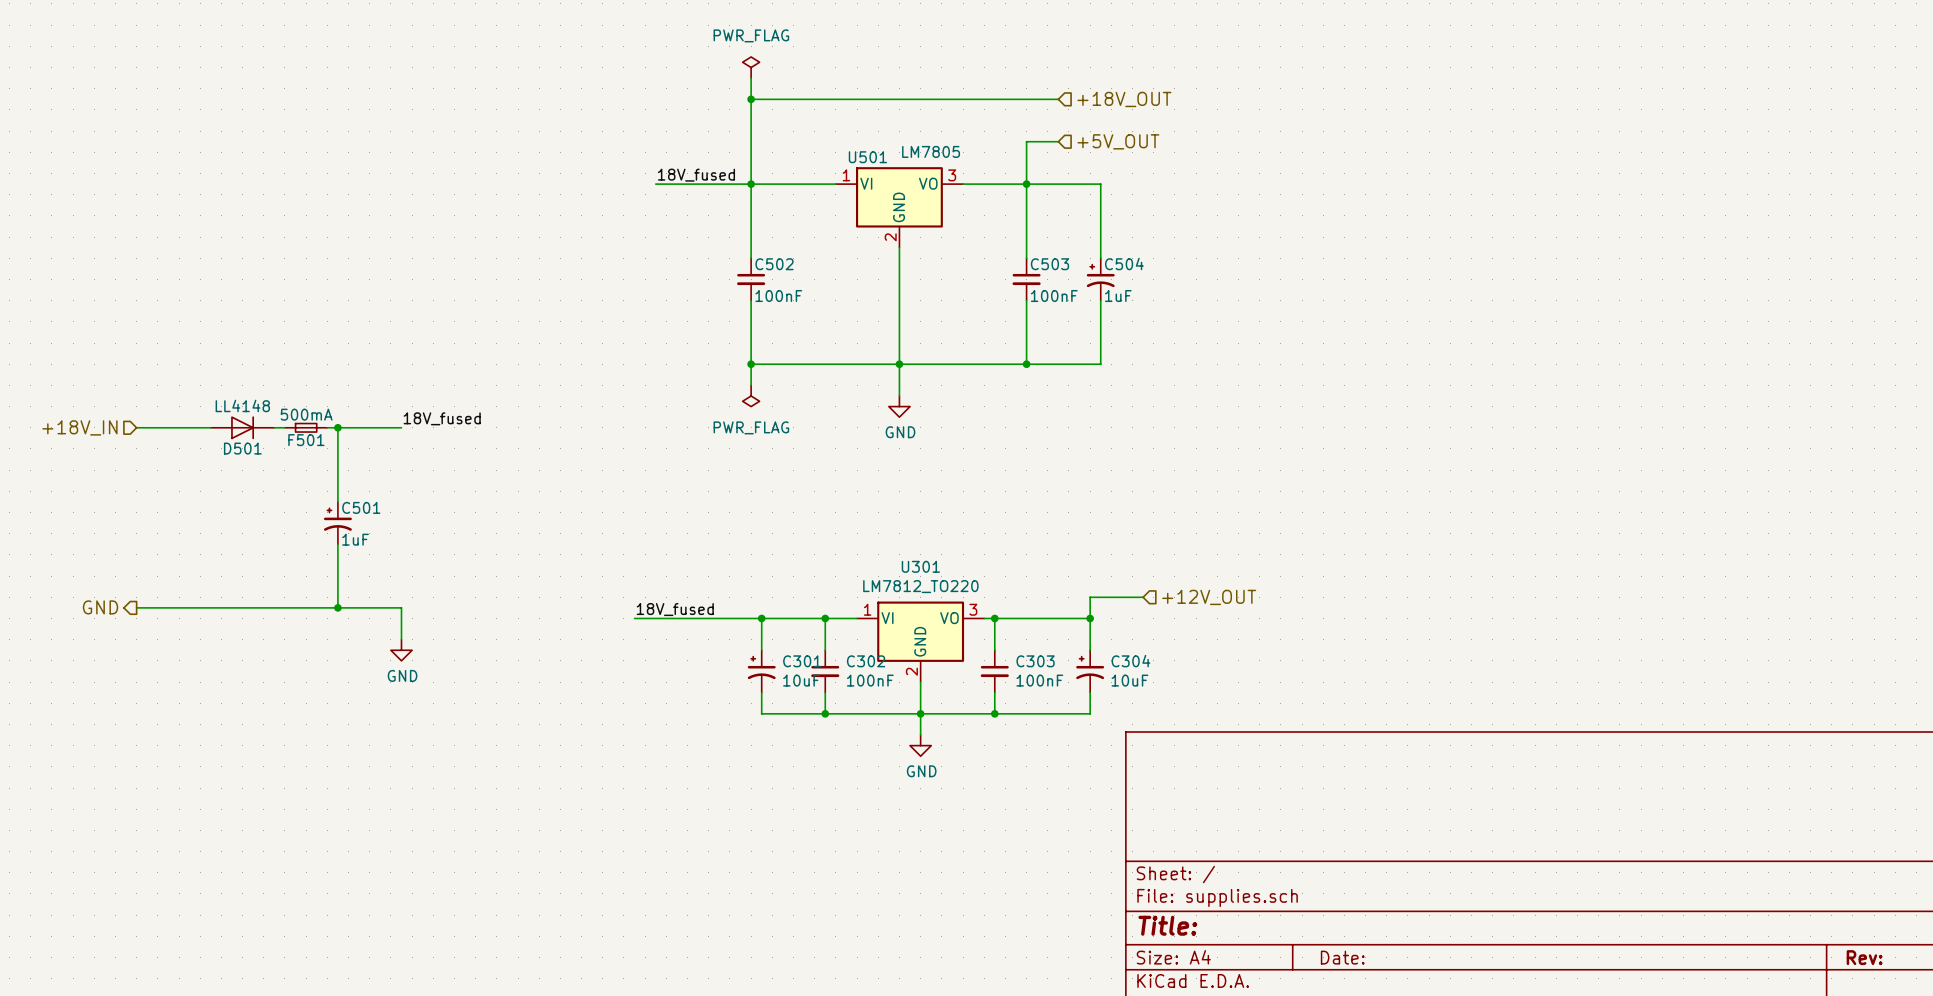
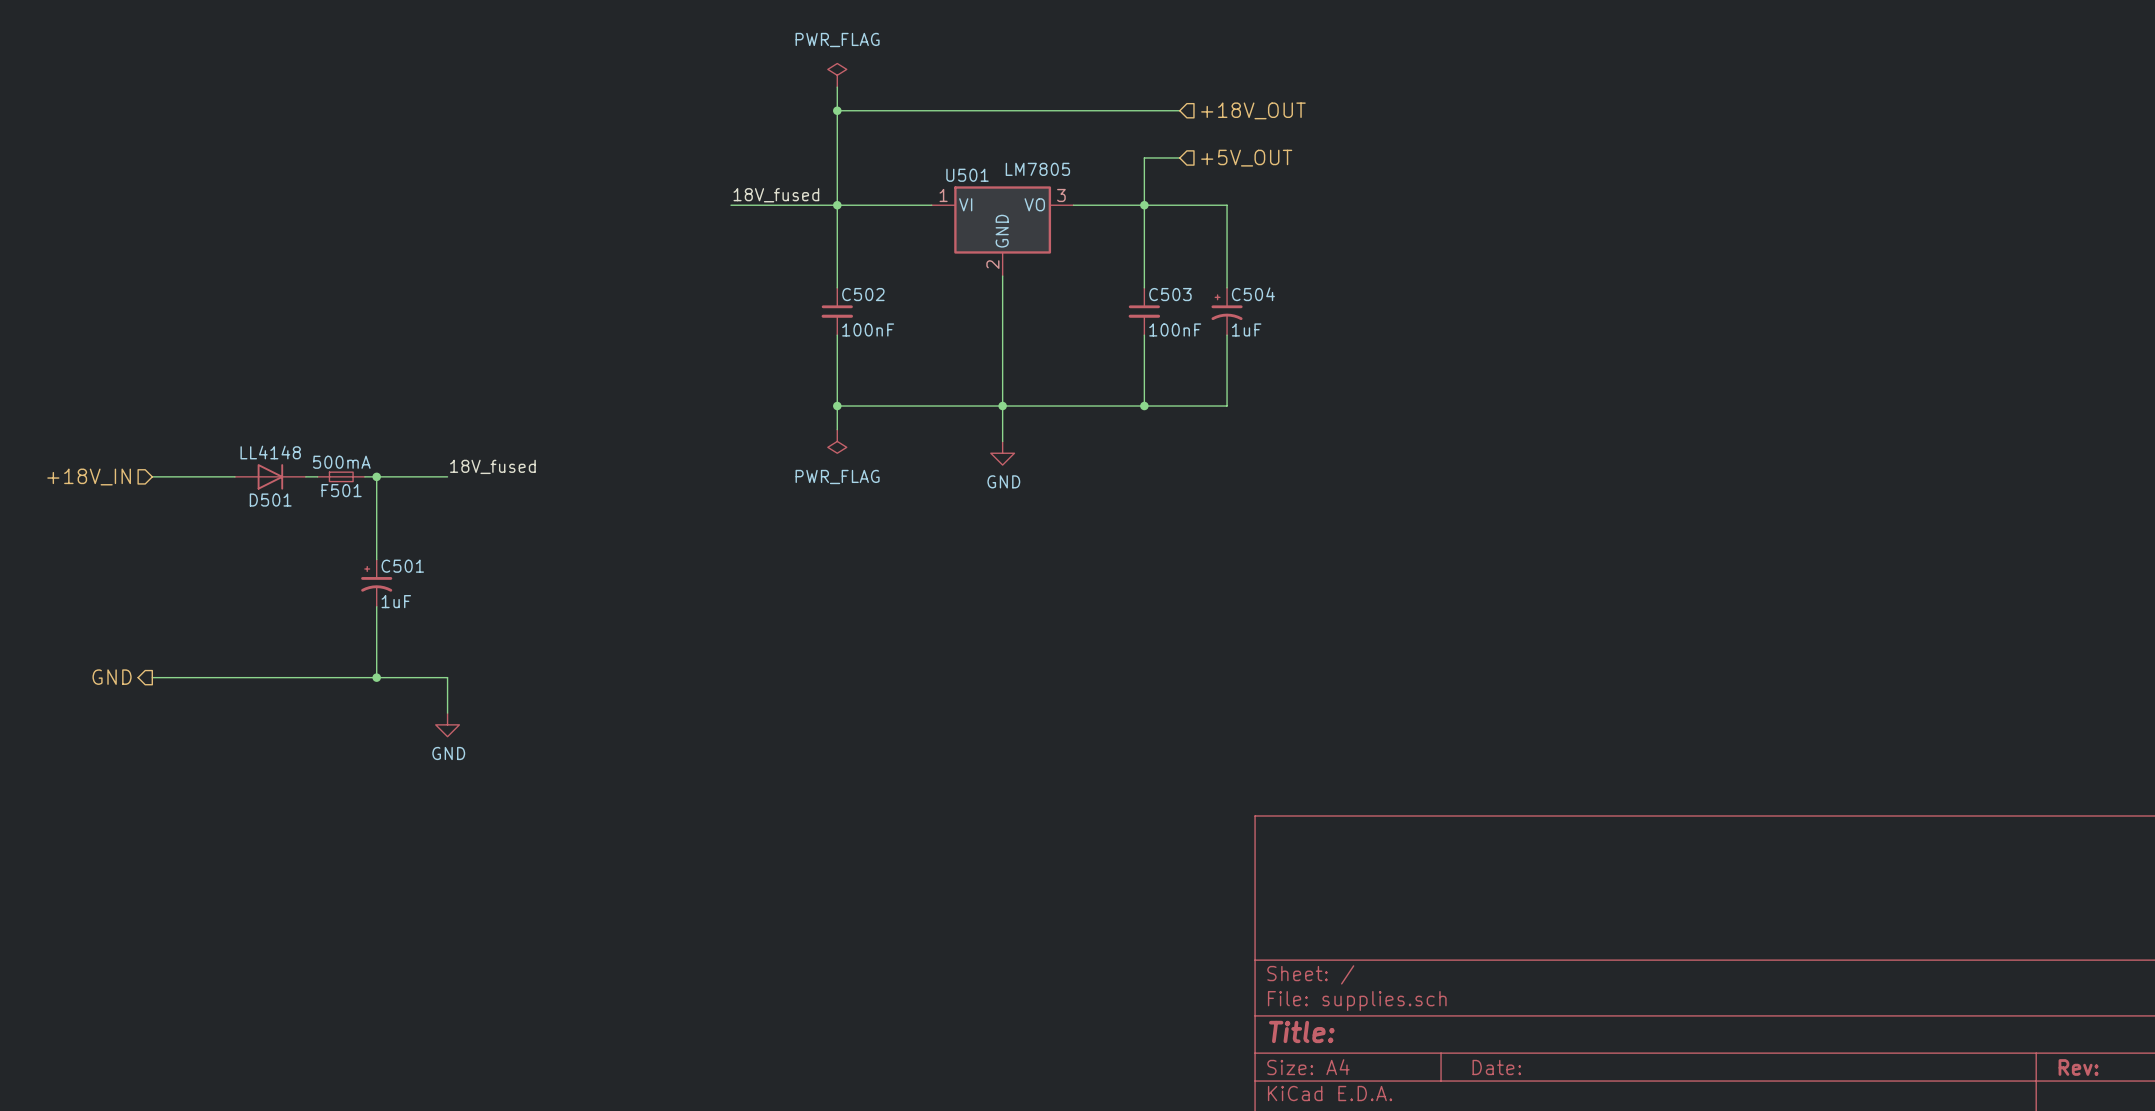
wire: (1143, 597) (1090, 597) (1090, 650) -> none
hierarchical label: +12V_OUT (1209, 597) -> none
label: 18V_fused (675, 609) -> none
wire: (634, 618) (857, 618) -> none
wire: (761, 618) (761, 650) -> none
junction: (761, 618) -> none
wire: (825, 618) (825, 650) -> none
junction: (825, 618) -> none
wire: (984, 618) (1090, 618) -> none
wire: (994, 618) (994, 650) -> none
junction: (994, 618) -> none
junction: (1090, 618) -> none
U301: LM7812_TO220 (920, 641) -> none
C301: 10uF (761, 671) -> none
C302: 100nF (825, 671) -> none
C303: 100nF (994, 671) -> none
C304: 10uF (1090, 671) -> none
wire: (920, 682) (920, 735) -> none
wire: (761, 692) (761, 713) (1090, 713) (1090, 692) -> none
wire: (825, 692) (825, 713) -> none
wire: (994, 692) (994, 713) -> none
junction: (825, 713) -> none
junction: (920, 713) -> none
junction: (994, 713) -> none
power symbol: GND (920, 745) -> none

